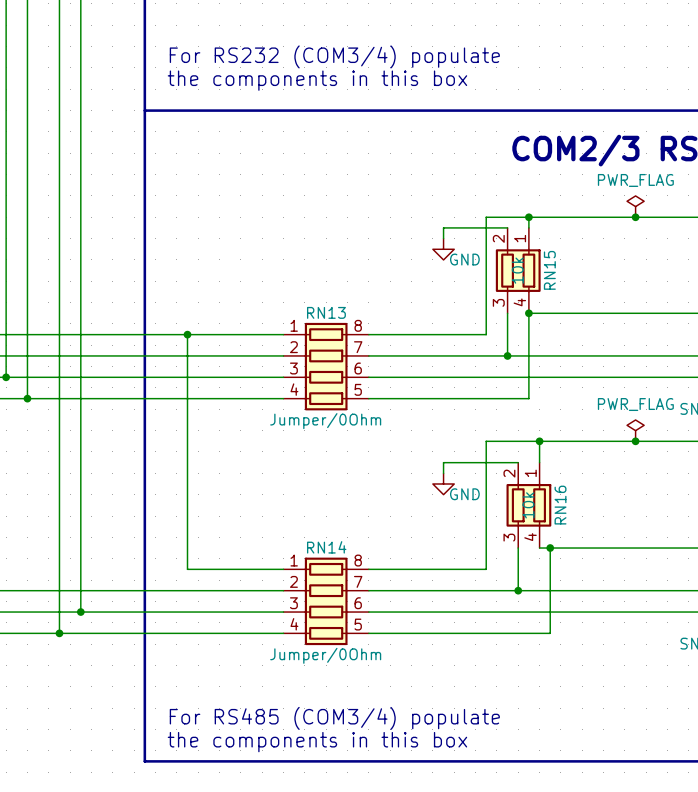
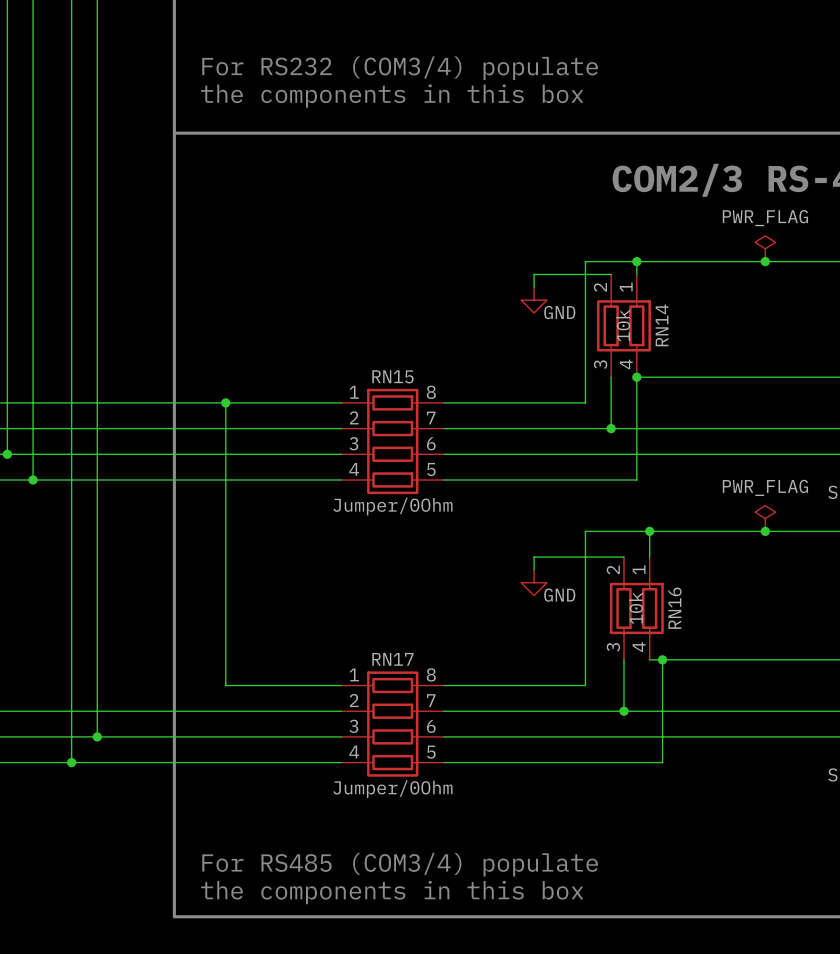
RN15 name: RN15 (549, 270) -> RN14 (662, 325)
RN13 name: RN13 (326, 312) -> RN15 (392, 376)
RN14 name: RN14 (326, 547) -> RN17 (392, 659)

